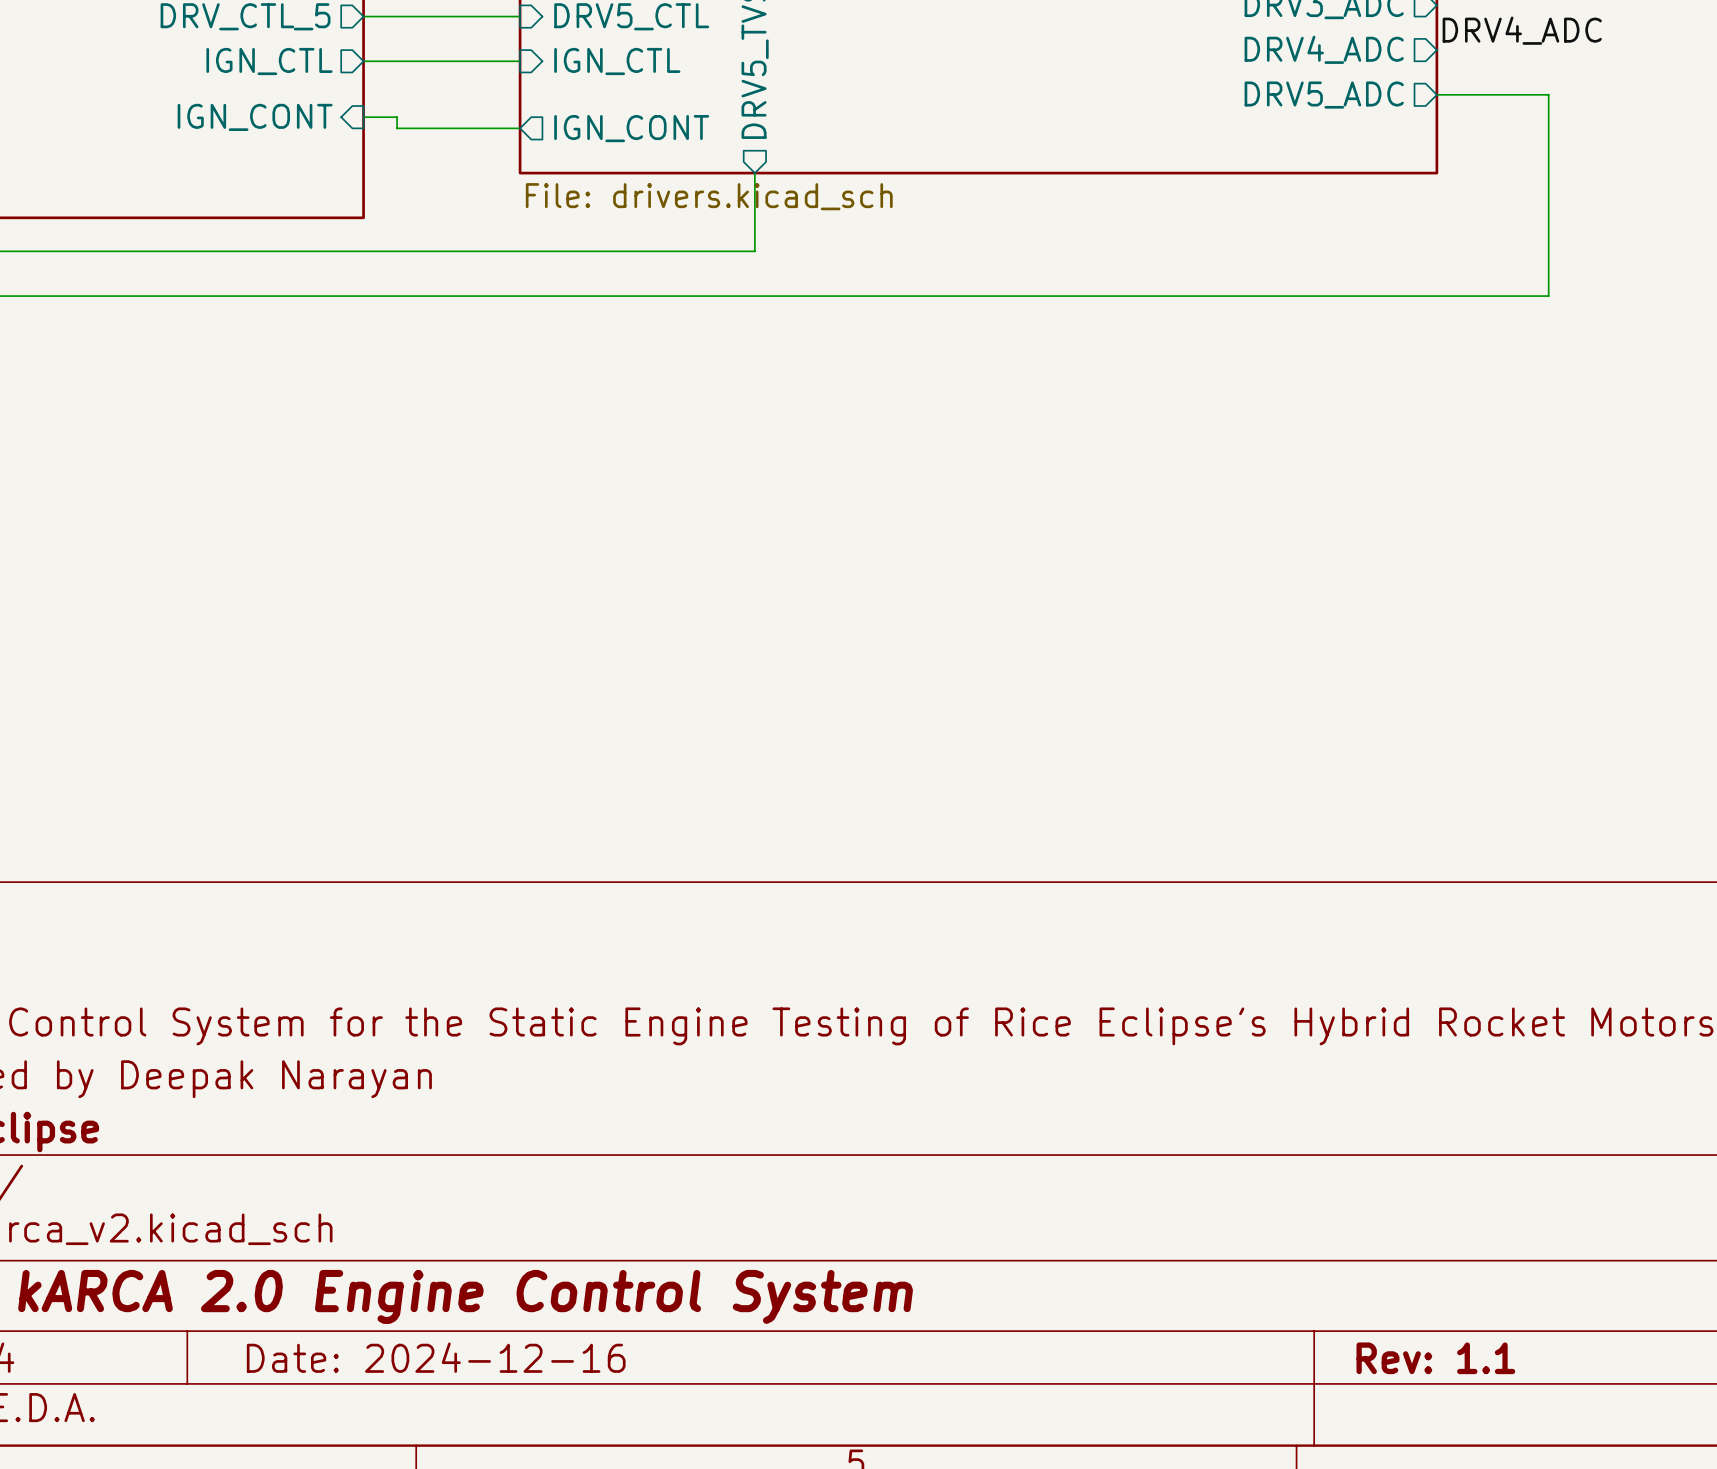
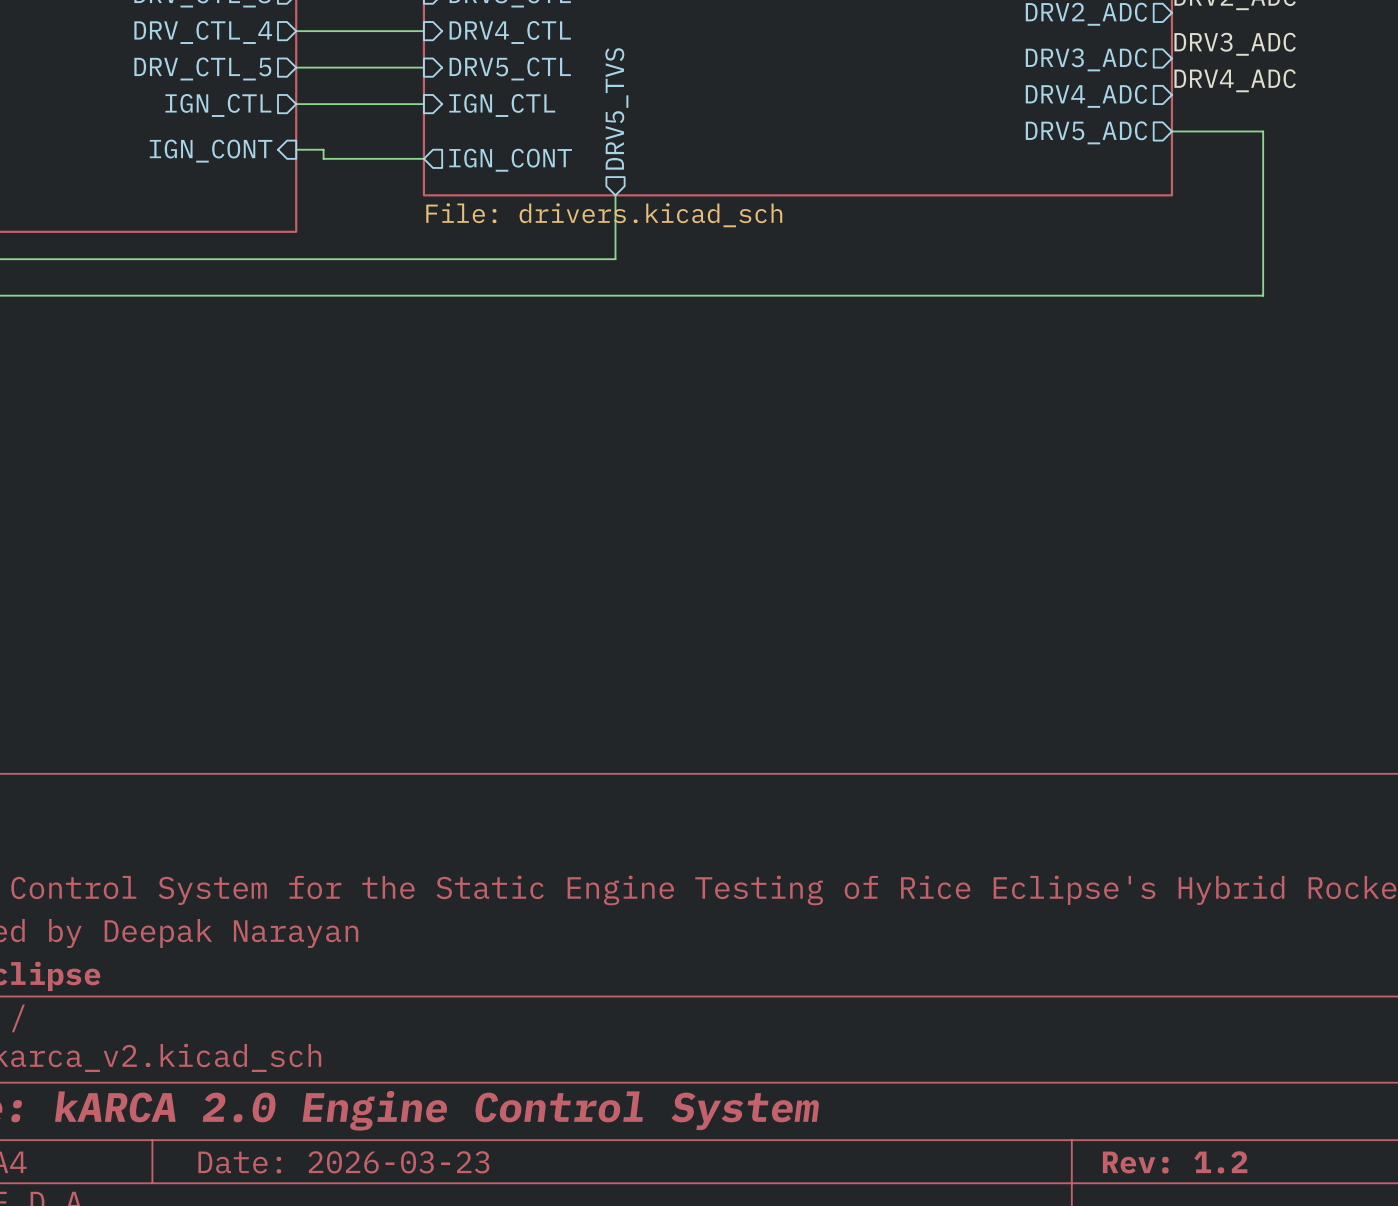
title block: Date: 2024-12-16 (436, 1357) -> Date: 2026-03-23 (343, 1162)
title block: Rev: 1.1 (1435, 1358) -> Rev: 1.2 (1175, 1162)

